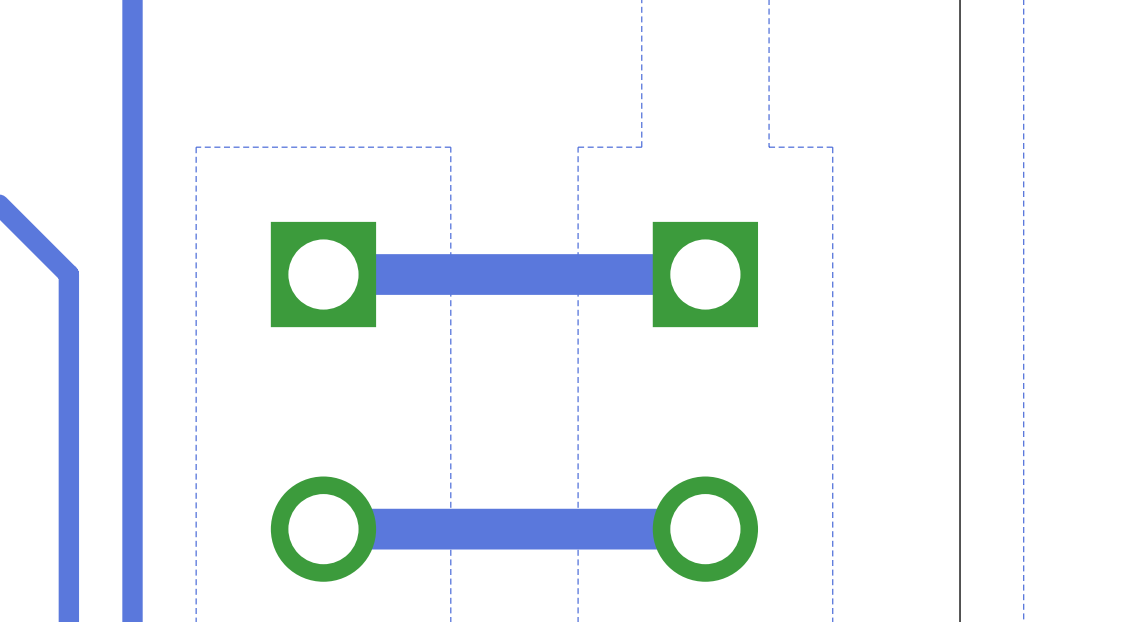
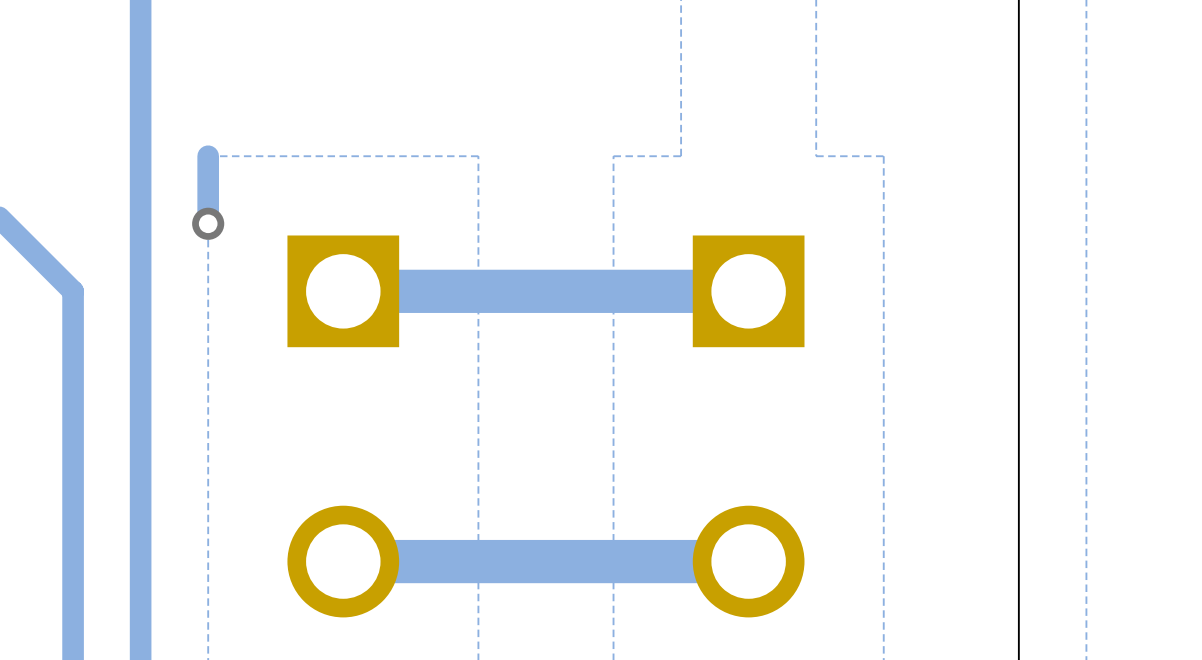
track: none -> (208, 156) (208, 223)
via: none -> (208, 223)

